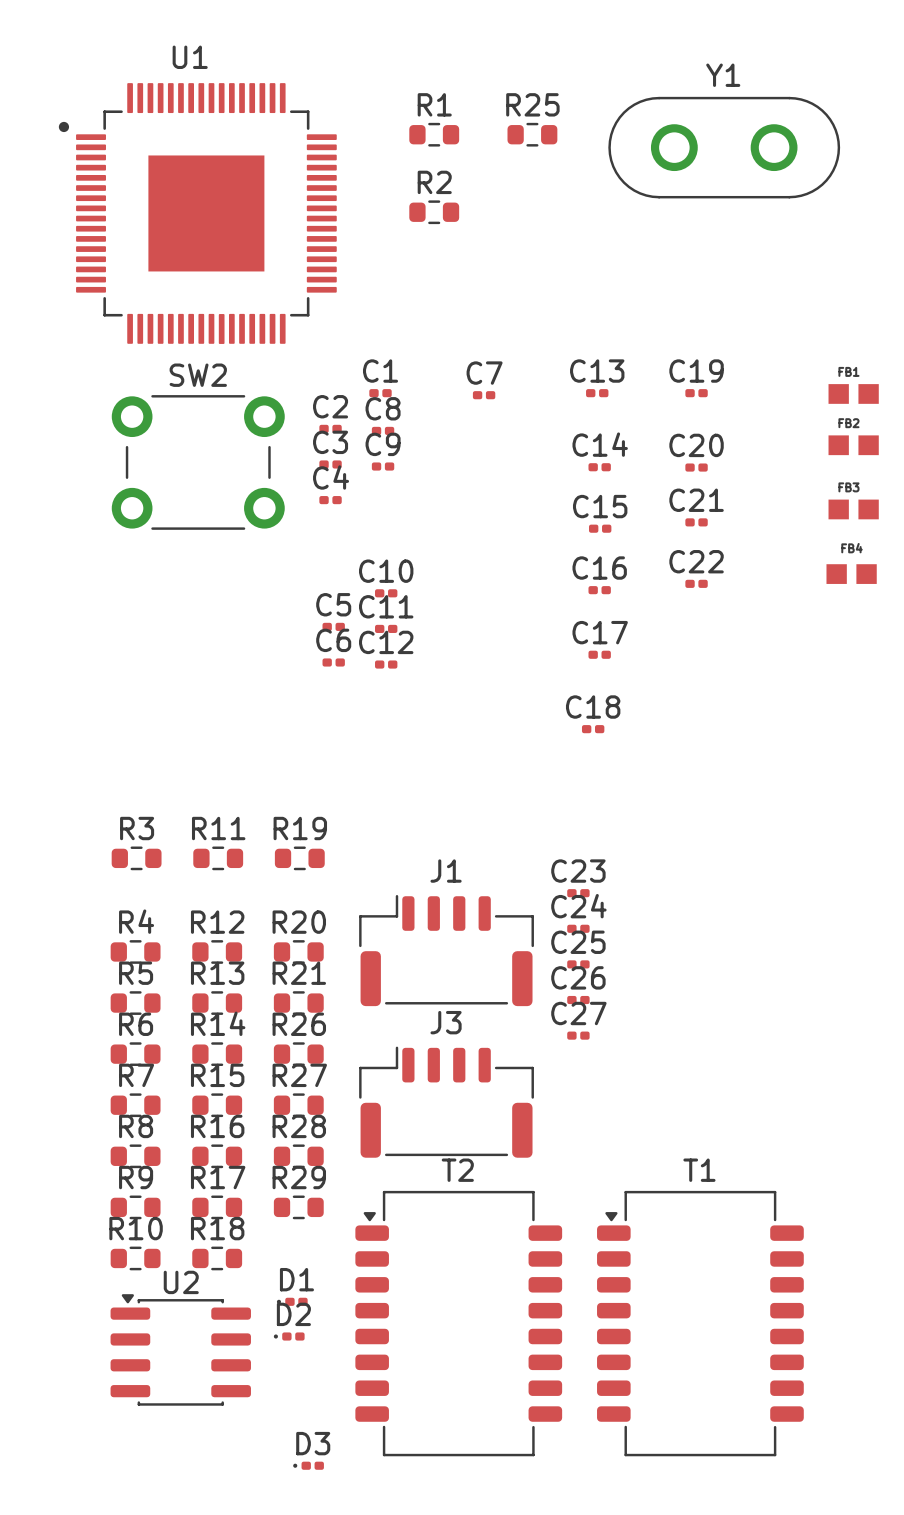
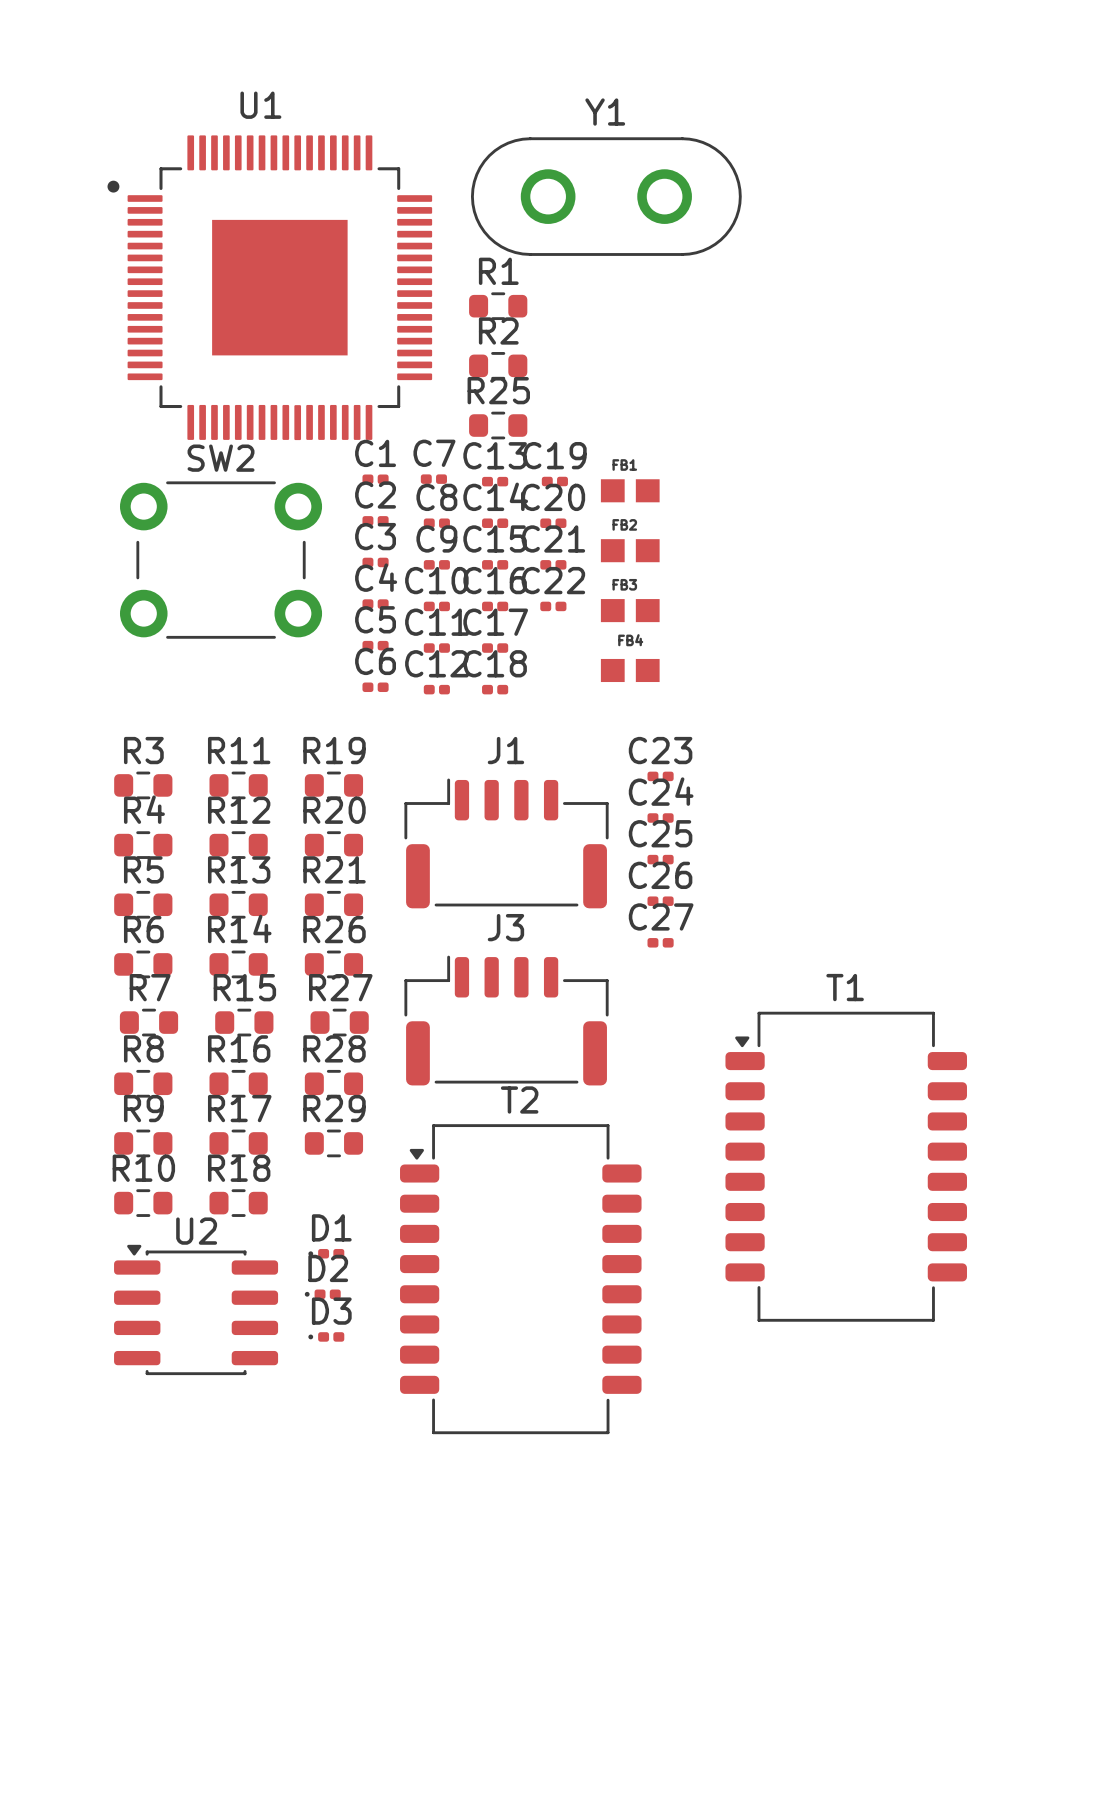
R1 position: (434, 134) -> (498, 306)
R25 position: (532, 134) -> (498, 425)
Y1 position: (724, 147) -> (606, 196)
R2 position: (434, 212) -> (498, 365)
U1 position: (197, 213) -> (269, 287)
C1 name: C1 (380, 371) -> C7 (434, 453)
C7 name: C7 (484, 373) -> C19 (554, 455)
C1: none -> (375, 479)
C13 position: (597, 393) -> (495, 481)
C19: (696, 393) -> none
FB1 position: (853, 393) -> (630, 490)
FB2 position: (853, 445) -> (630, 550)
C14 position: (599, 467) -> (495, 523)
C20 position: (696, 467) -> (553, 523)
FB3 position: (853, 509) -> (630, 610)
C21 position: (696, 522) -> (553, 564)
C15 position: (600, 528) -> (495, 564)
FB4 position: (851, 574) -> (630, 670)
C22 position: (696, 583) -> (553, 606)
C16 position: (599, 590) -> (495, 606)
C10 position: (386, 593) -> (436, 606)
C5 position: (333, 626) -> (375, 645)
C11 position: (386, 628) -> (436, 648)
C17 position: (599, 654) -> (495, 648)
R3: none -> (143, 785)
R11: none -> (238, 785)
R19: none -> (333, 785)
C6 position: (333, 662) -> (375, 687)
C12 position: (386, 664) -> (436, 689)
C18 position: (593, 729) -> (495, 689)
R3 name: R3 (137, 828) -> R7 (150, 987)
R11 name: R11 (218, 828) -> R15 (244, 987)
R19 name: R19 (300, 828) -> R27 (340, 987)
C23 position: (578, 893) -> (660, 776)
C24 position: (578, 928) -> (660, 818)
J1 position: (446, 950) -> (506, 843)
R4 position: (135, 951) -> (143, 845)
R12 position: (217, 951) -> (238, 845)
R20 position: (298, 951) -> (333, 845)
C25 position: (578, 964) -> (660, 859)
C26 position: (578, 1000) -> (660, 901)
R5 position: (135, 1003) -> (143, 904)
R13 position: (217, 1003) -> (238, 904)
R21 position: (298, 1003) -> (333, 904)
C27 position: (578, 1035) -> (660, 942)
R6 position: (135, 1054) -> (143, 964)
R14 position: (217, 1054) -> (238, 964)
R26 position: (298, 1054) -> (333, 964)
J3 position: (446, 1102) -> (506, 1020)
R7: (135, 1105) -> none
R15: (217, 1105) -> none
R27: (298, 1105) -> none
R8 position: (135, 1156) -> (143, 1083)
R16 position: (217, 1156) -> (238, 1083)
R28 position: (298, 1156) -> (333, 1083)
R9 position: (135, 1207) -> (143, 1143)
R17 position: (217, 1207) -> (238, 1143)
R29 position: (298, 1207) -> (333, 1143)
R10 position: (135, 1258) -> (143, 1203)
R18 position: (217, 1258) -> (238, 1203)
D1 position: (292, 1301) -> (326, 1253)
T2 position: (458, 1323) -> (520, 1279)
T1 position: (700, 1323) -> (846, 1166)
D2 position: (289, 1336) -> (322, 1294)
U2 position: (180, 1349) -> (196, 1309)
D3 position: (308, 1465) -> (326, 1336)

